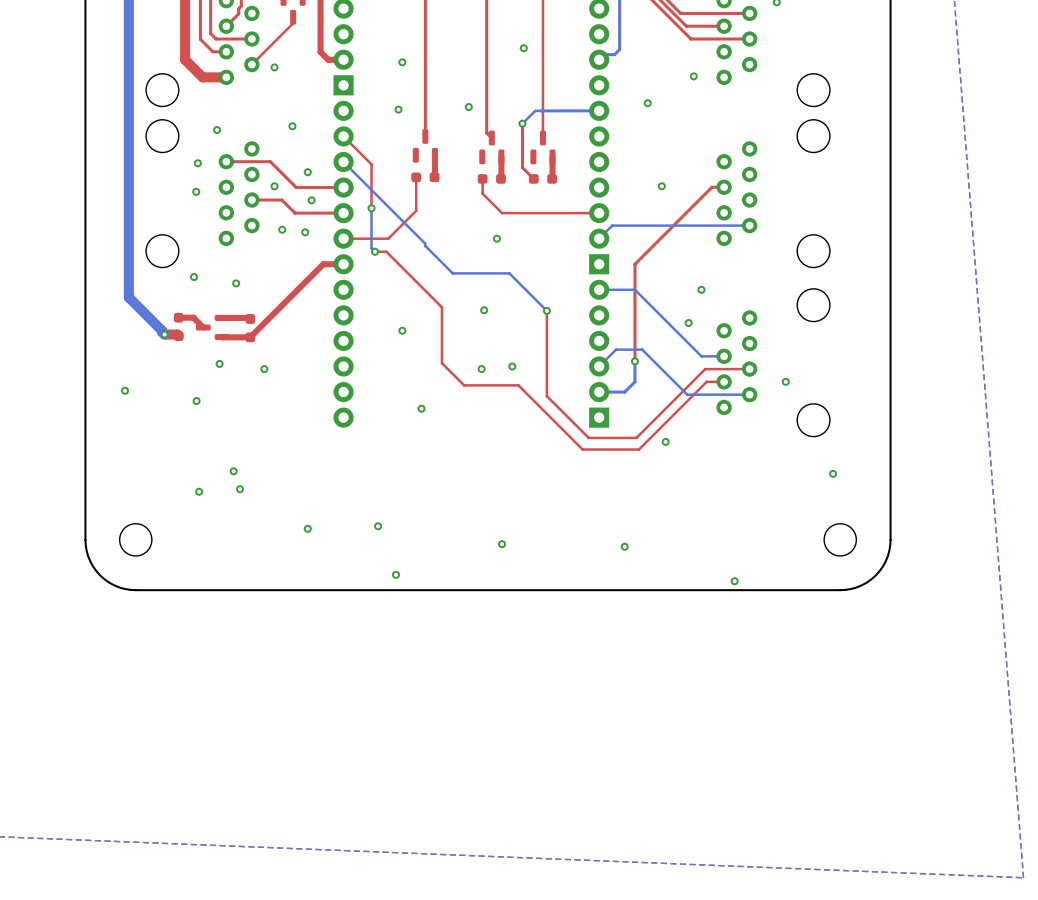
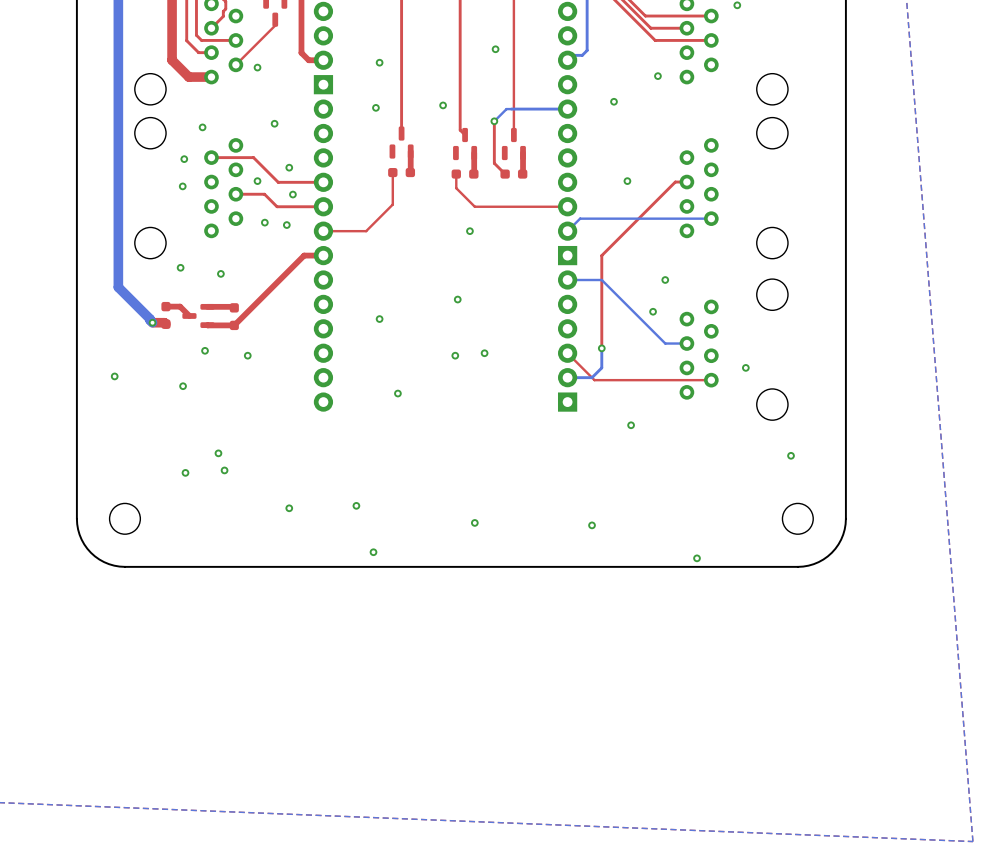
top track: (343, 136) (371, 164) (371, 208) -> none
bottom track: (343, 162) (452, 273) (509, 273) (546, 310) -> none
bottom track: (371, 208) (371, 248) (375, 251) -> none
via: (371, 208) -> none
top track: (375, 251) (386, 251) (441, 307) (441, 363) (464, 385) (518, 385) (582, 449) (638, 449) (706, 381) (724, 381) -> none
via: (375, 251) -> none
top track: (546, 310) (546, 396) (588, 437) (636, 437) (705, 369) (749, 369) -> none
via: (546, 310) -> none
top track: none -> (567, 353) (594, 380) (711, 380)
bottom track: (599, 366) (616, 349) (642, 349) (687, 394) (749, 394) -> none

